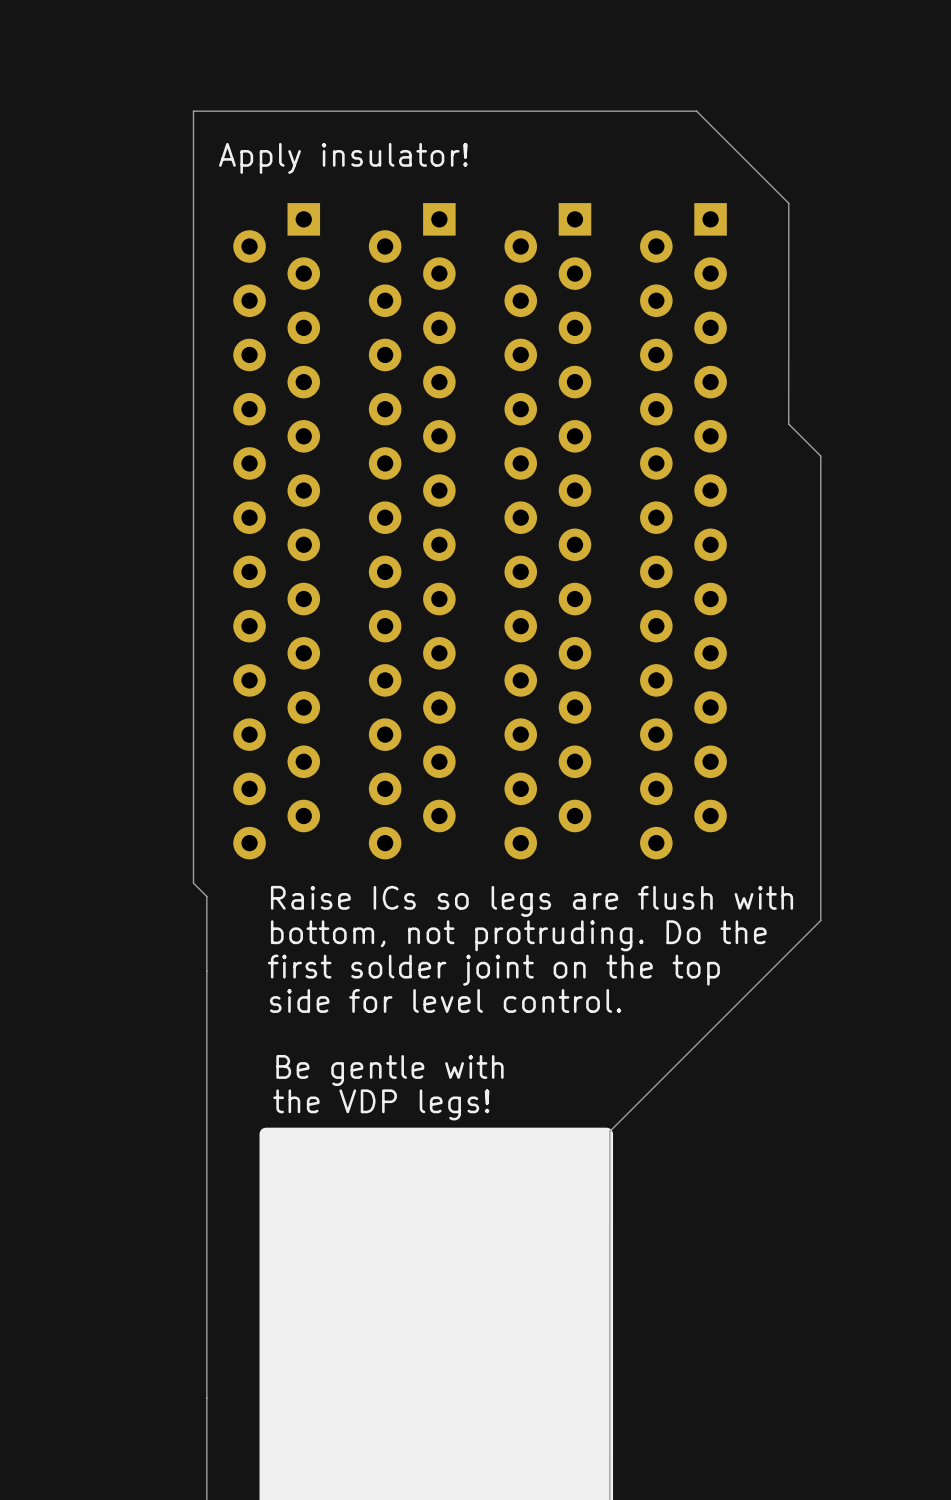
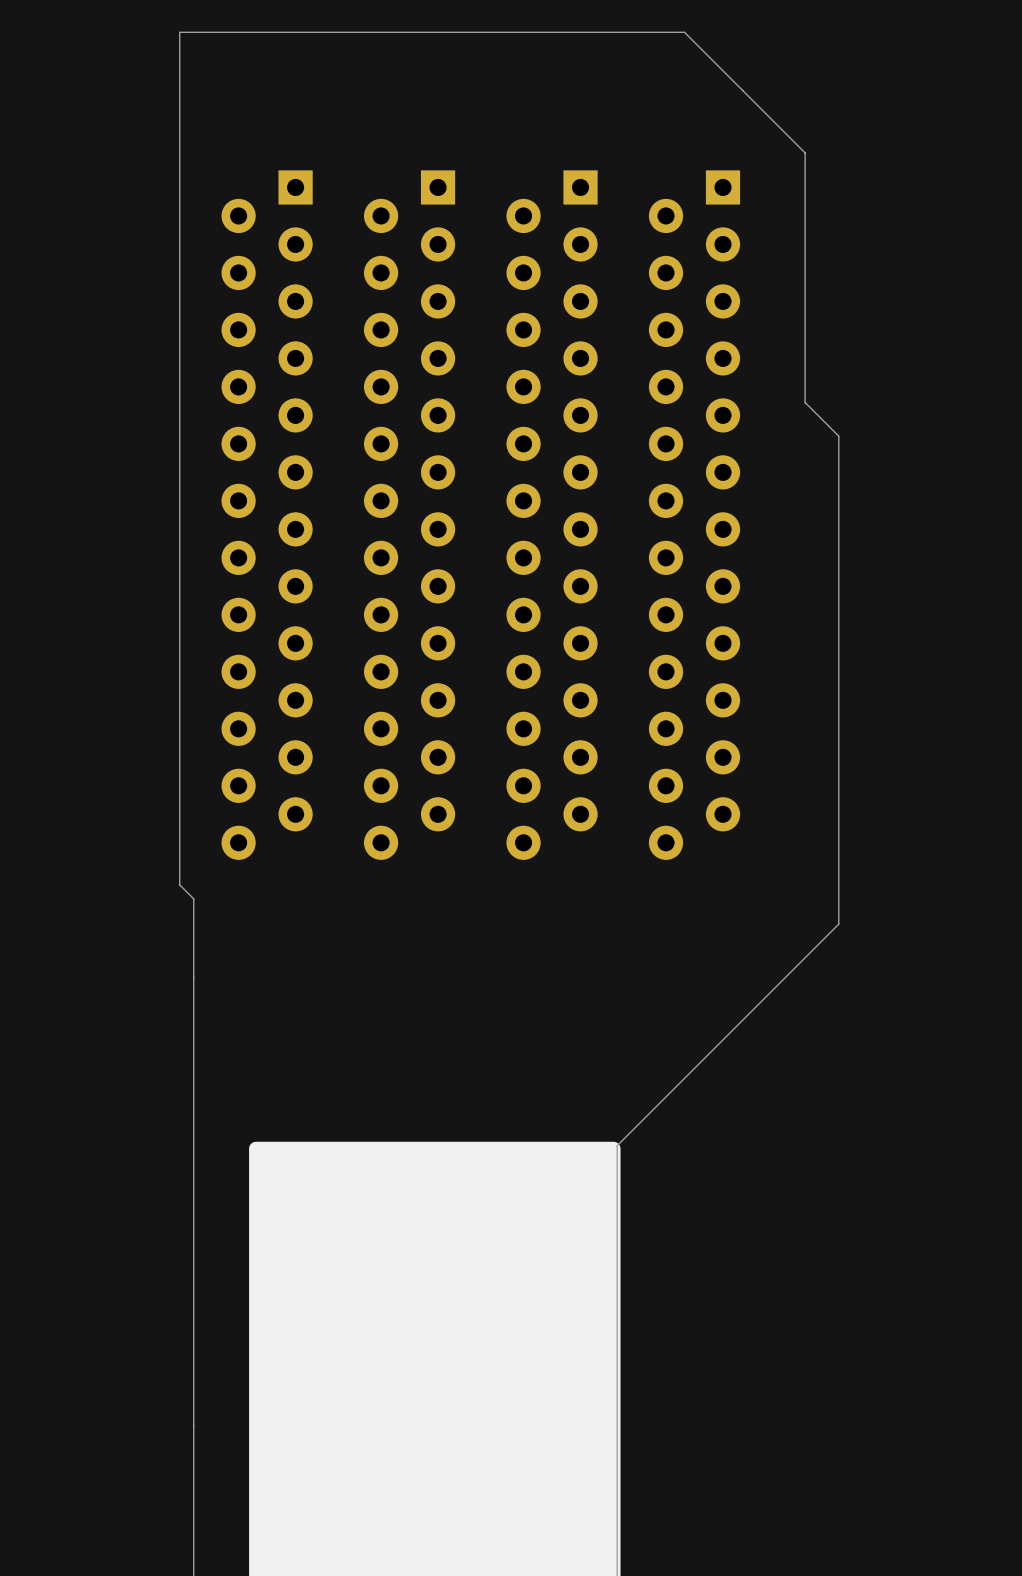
board edge: (193, 111) (696, 111) (788, 203) (788, 424) -> (179, 73) (179, 32) (684, 32) (805, 152) (805, 402)
text: Apply insulator! (343, 158) -> none
text: Raise ICs so legs are flush with (532, 901) -> none
text: bottom, not protruding. Do the (518, 935) -> none
text: first solder joint on the top (493, 970) -> none
text: side for level control. (445, 1000) -> none
text: Be gentle with (389, 1070) -> none
text: the VDP legs! (381, 1104) -> none

